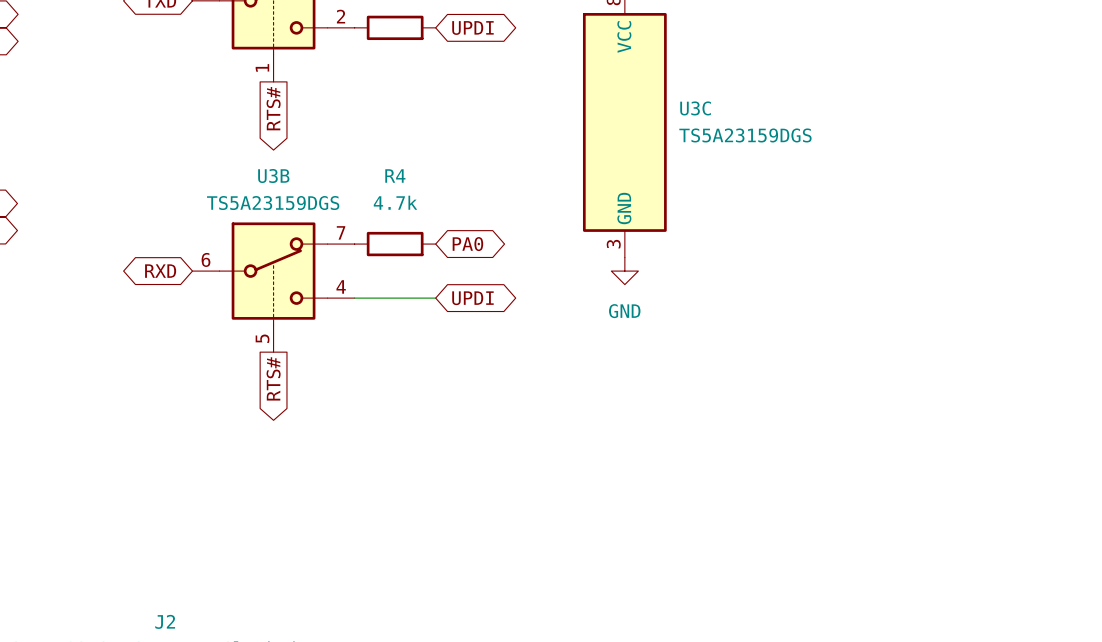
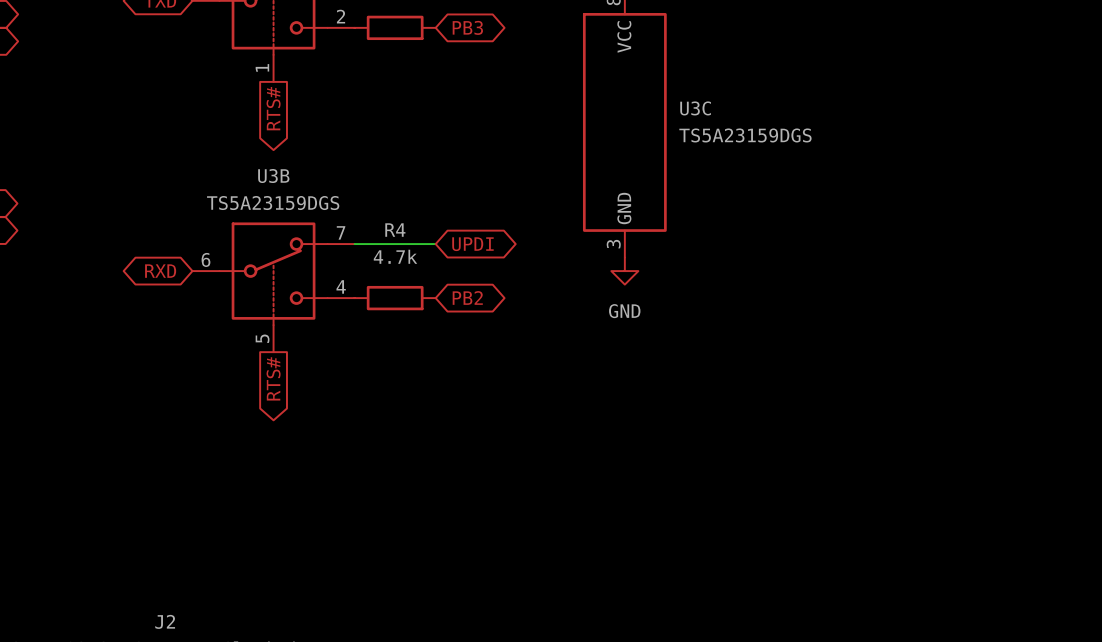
global label: UPDI (472, 28) -> PB3 (467, 27)
R4 position: (395, 244) -> (395, 298)
global label: PA0 (467, 244) -> UPDI (472, 244)
wire: (354, 298) (435, 298) -> (354, 244) (435, 244)
global label: UPDI (472, 298) -> PB2 (467, 297)

